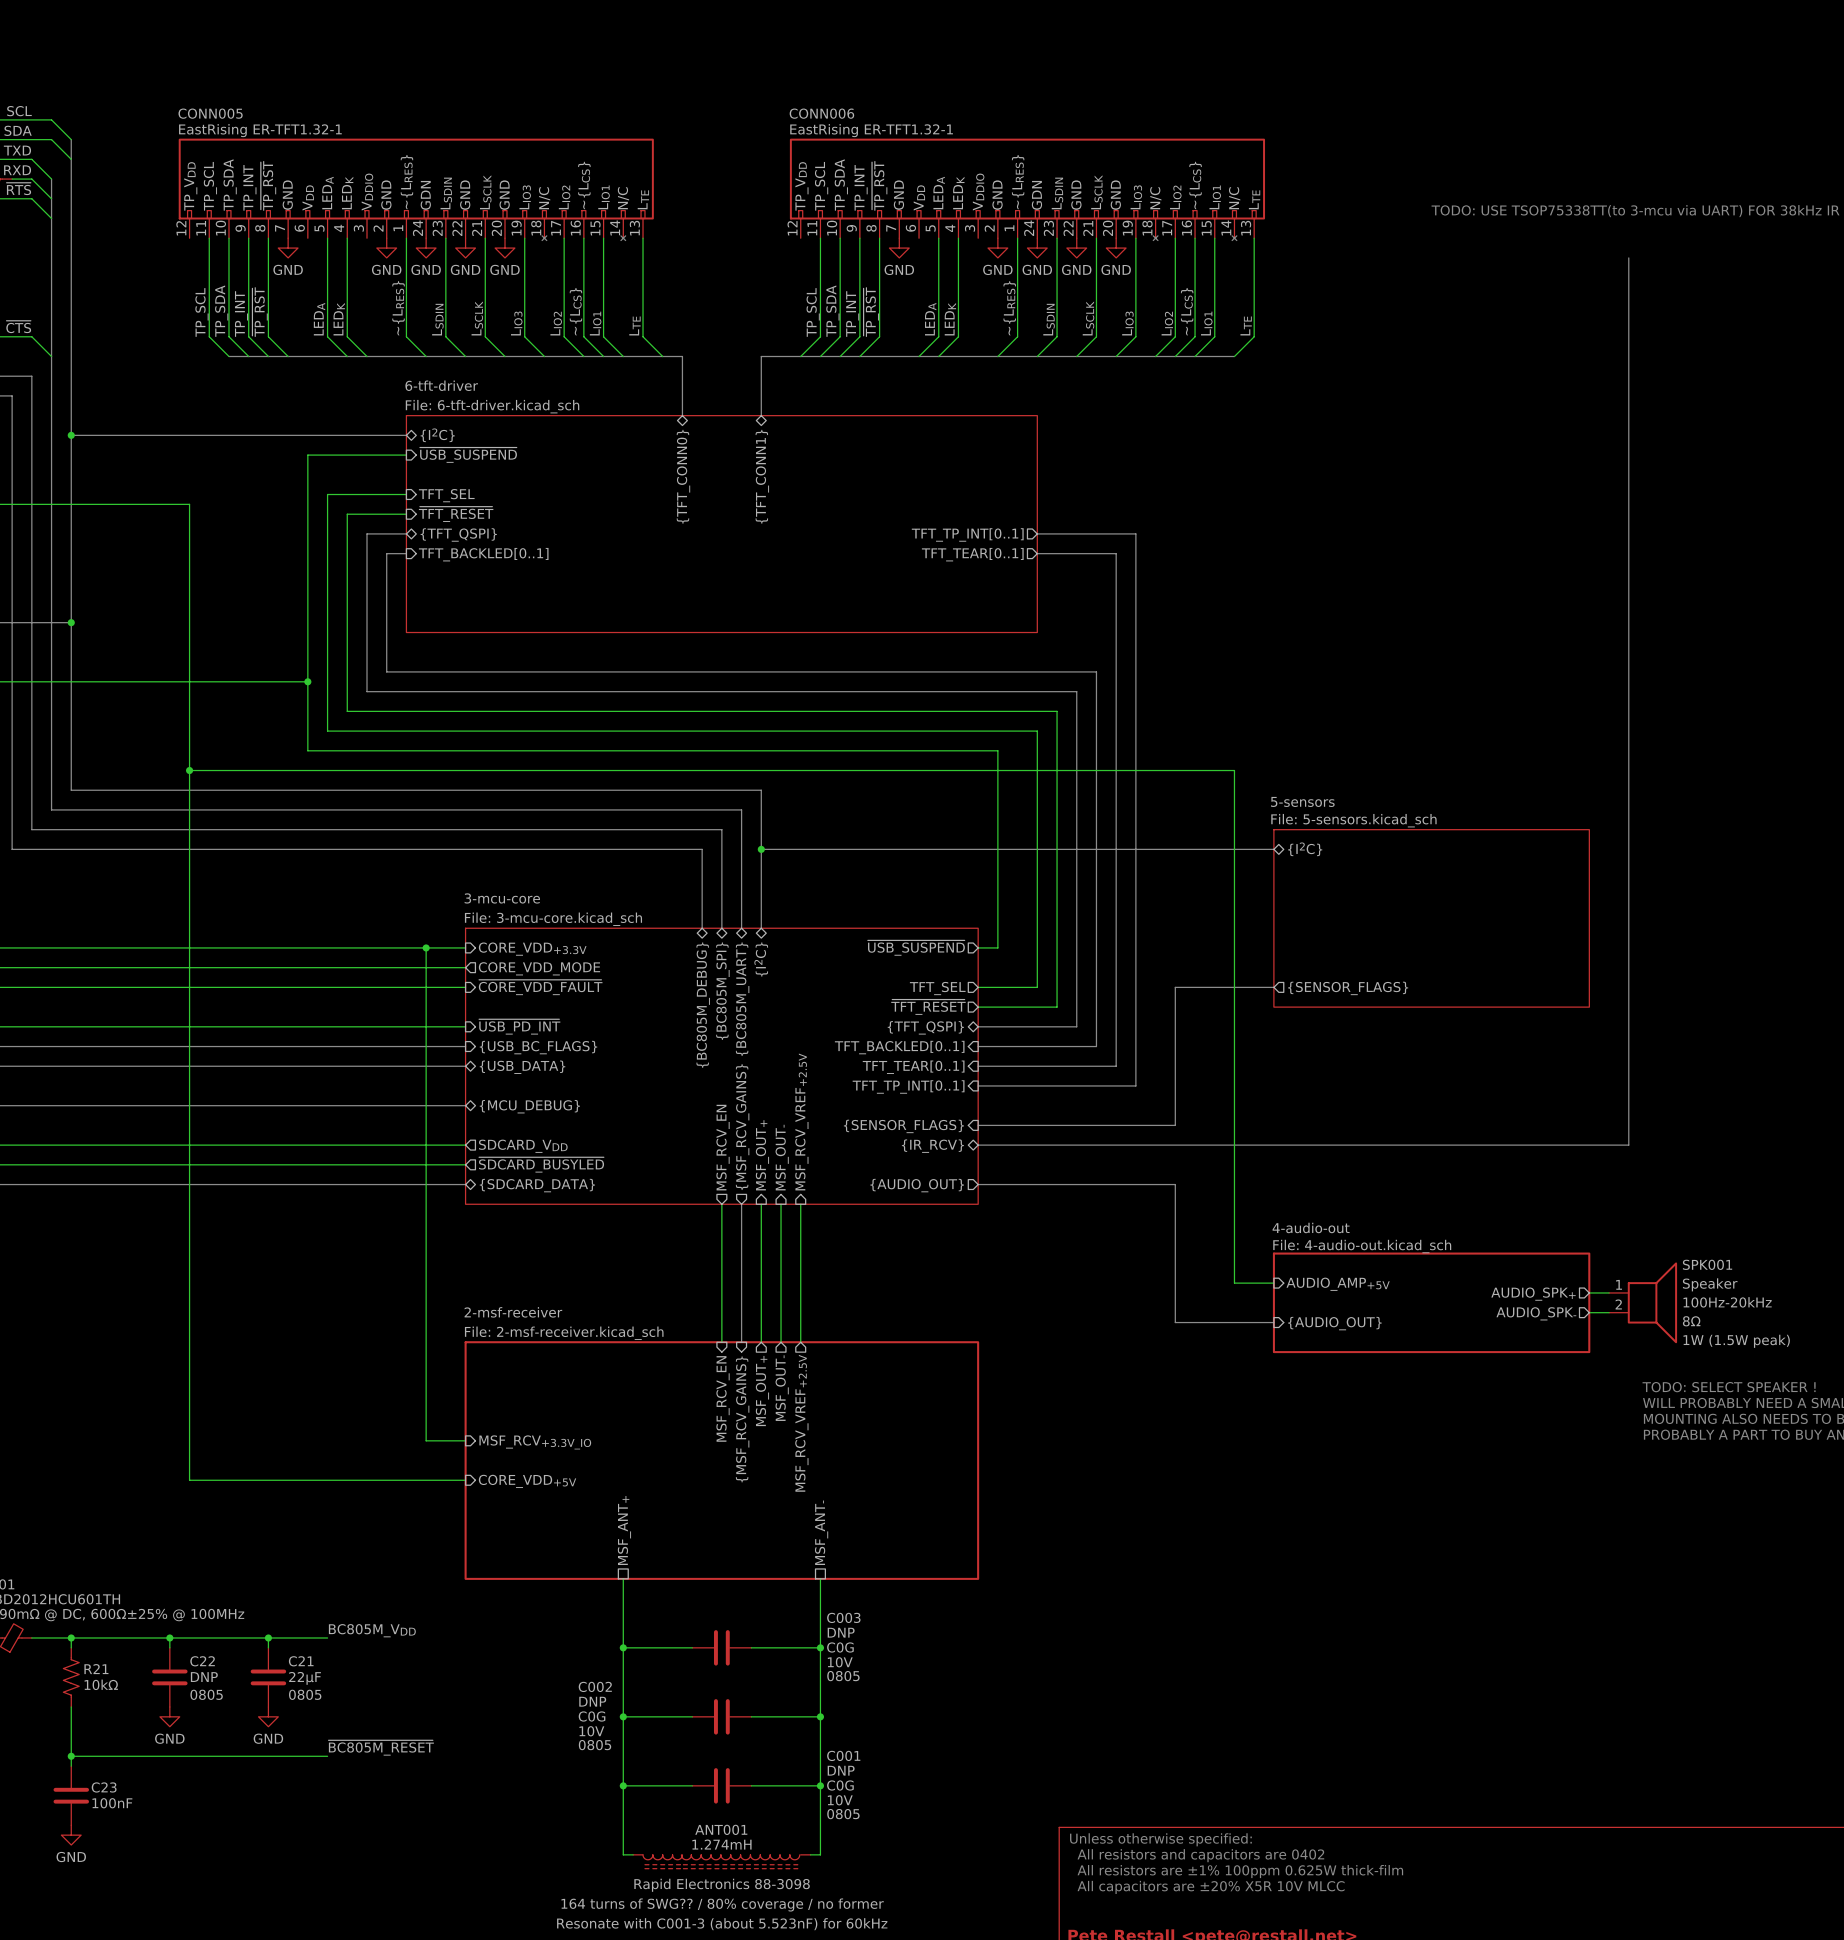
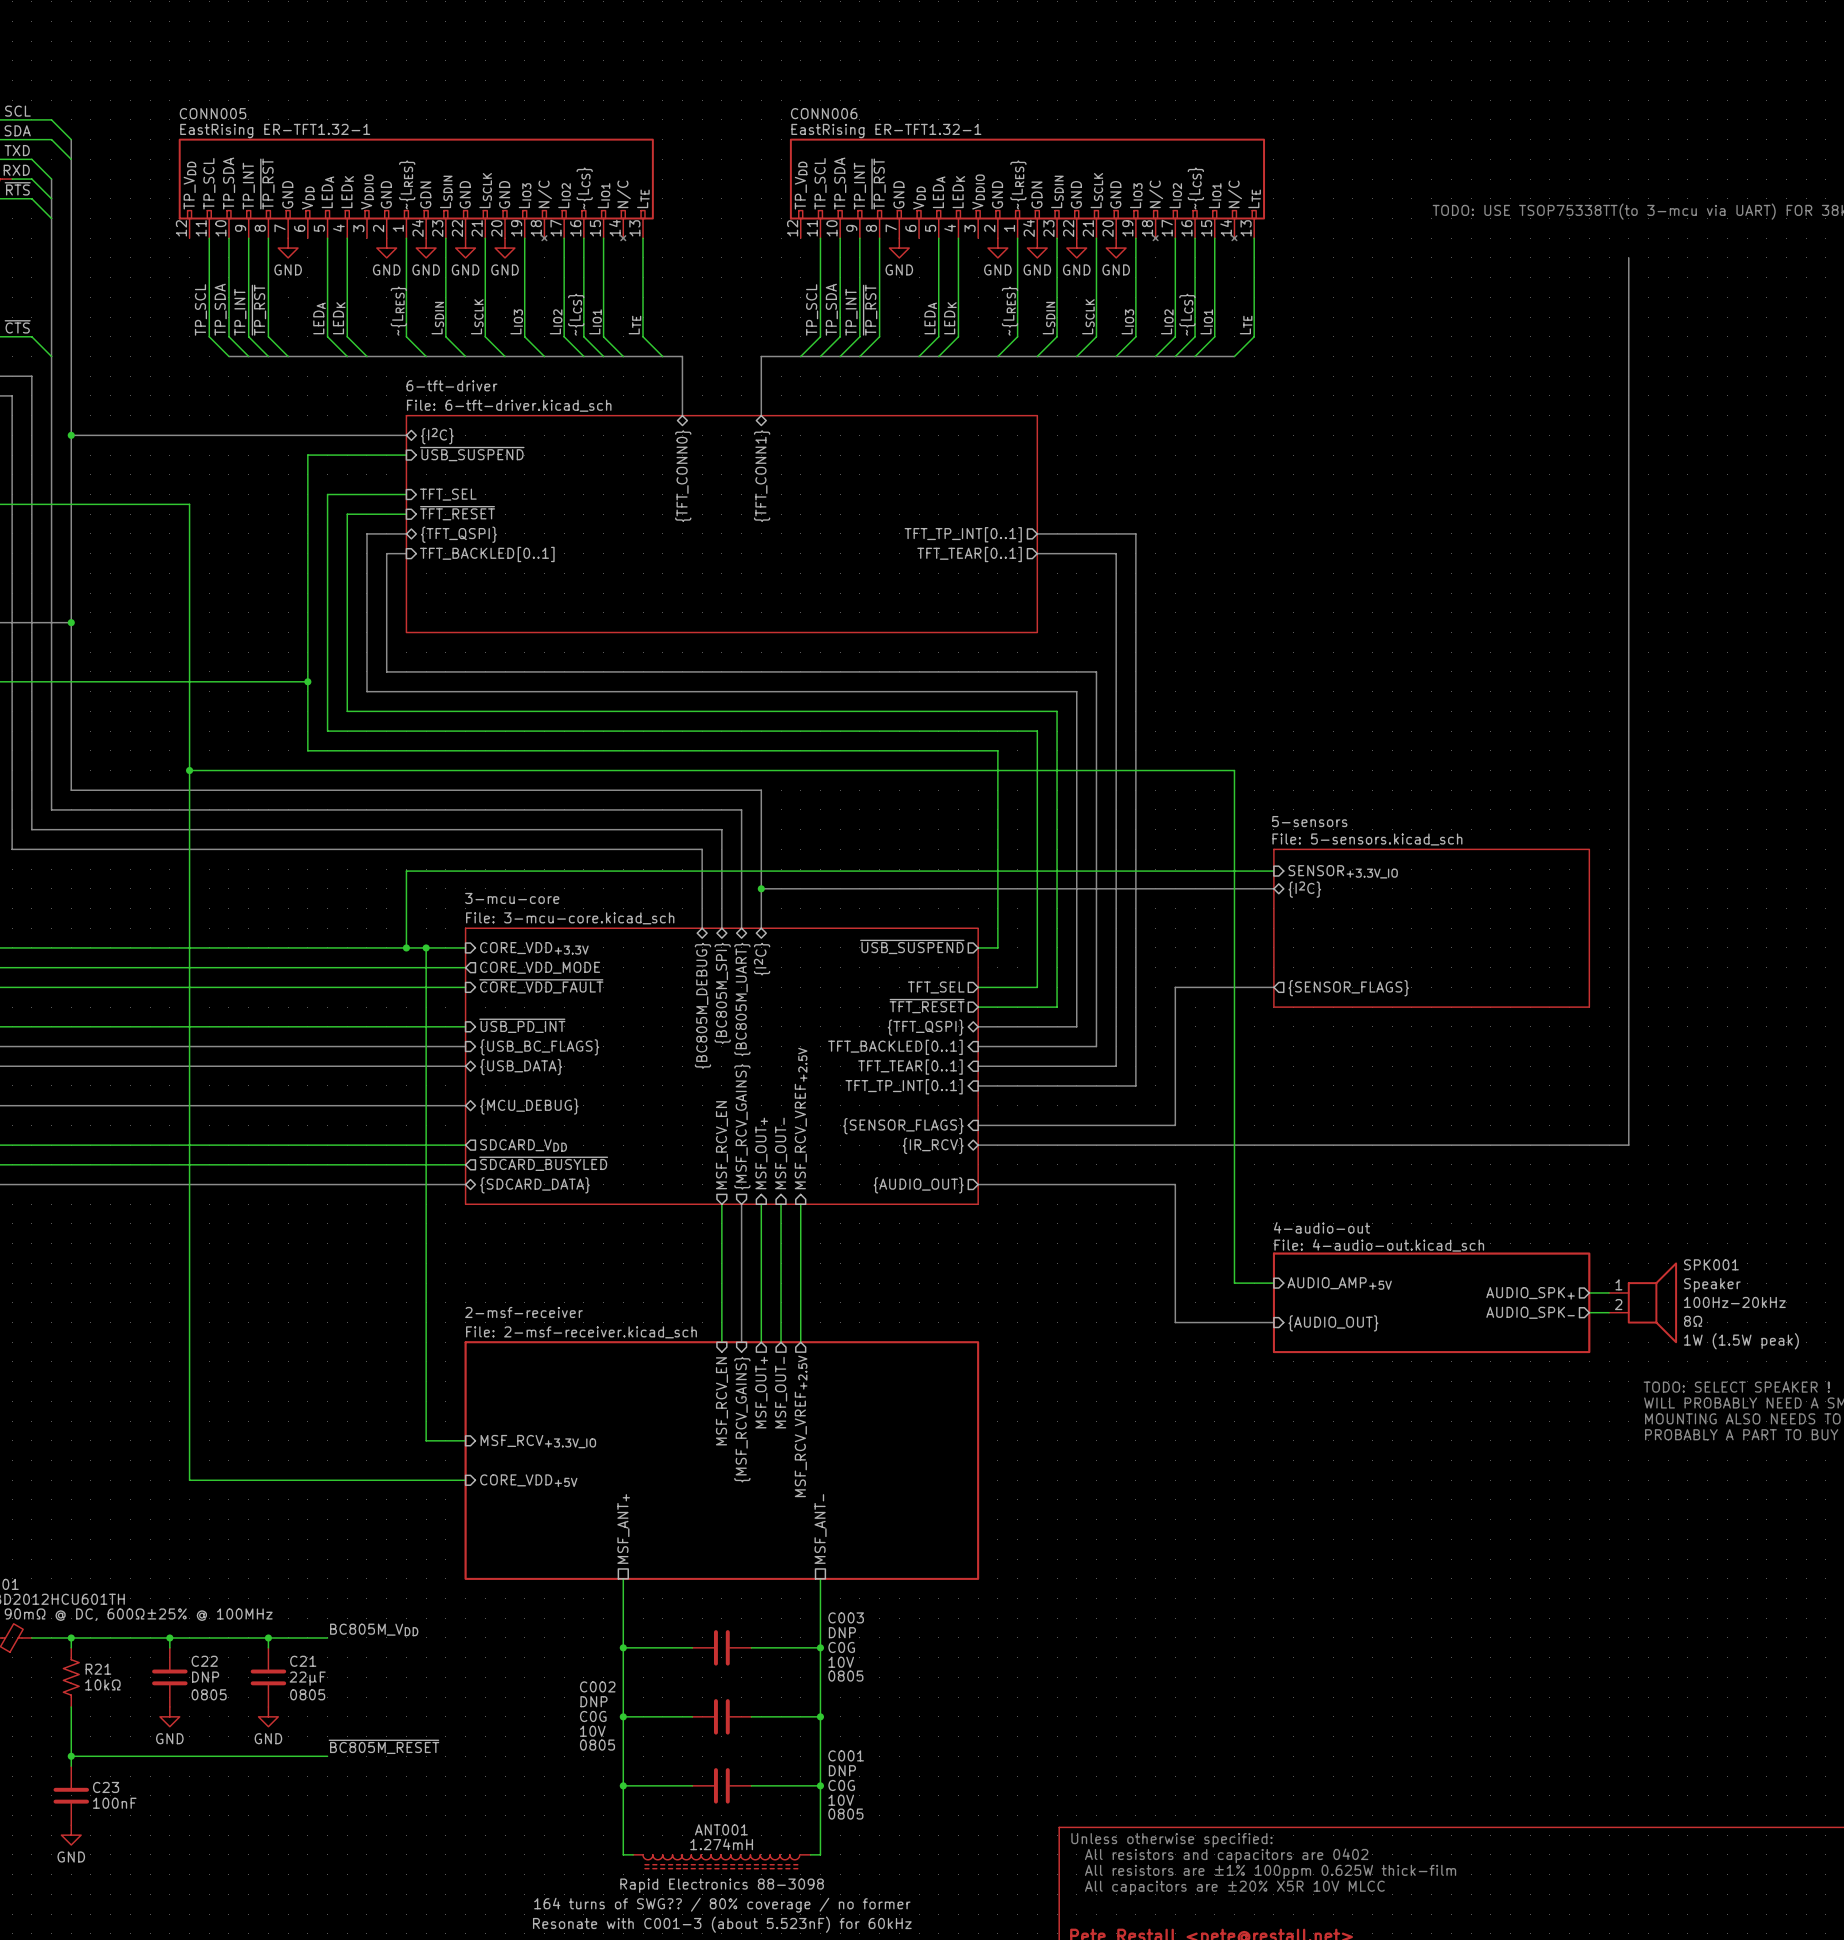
sheet 5-sensors shape: [1273, 829, 1590, 1008] -> [1273, 848, 1590, 1008]
bus: (761, 849) (1273, 849) -> (761, 888) (1273, 888)
junction position: (761, 849) -> (761, 888)
sheet pin position: {I2C} (1305, 849) -> {I2C} (1304, 889)
wire: none -> (1273, 871) (406, 871) (406, 947)
sheet pin: none -> SENSOR+3.3V_IO (1343, 871)
junction: none -> (406, 947)

